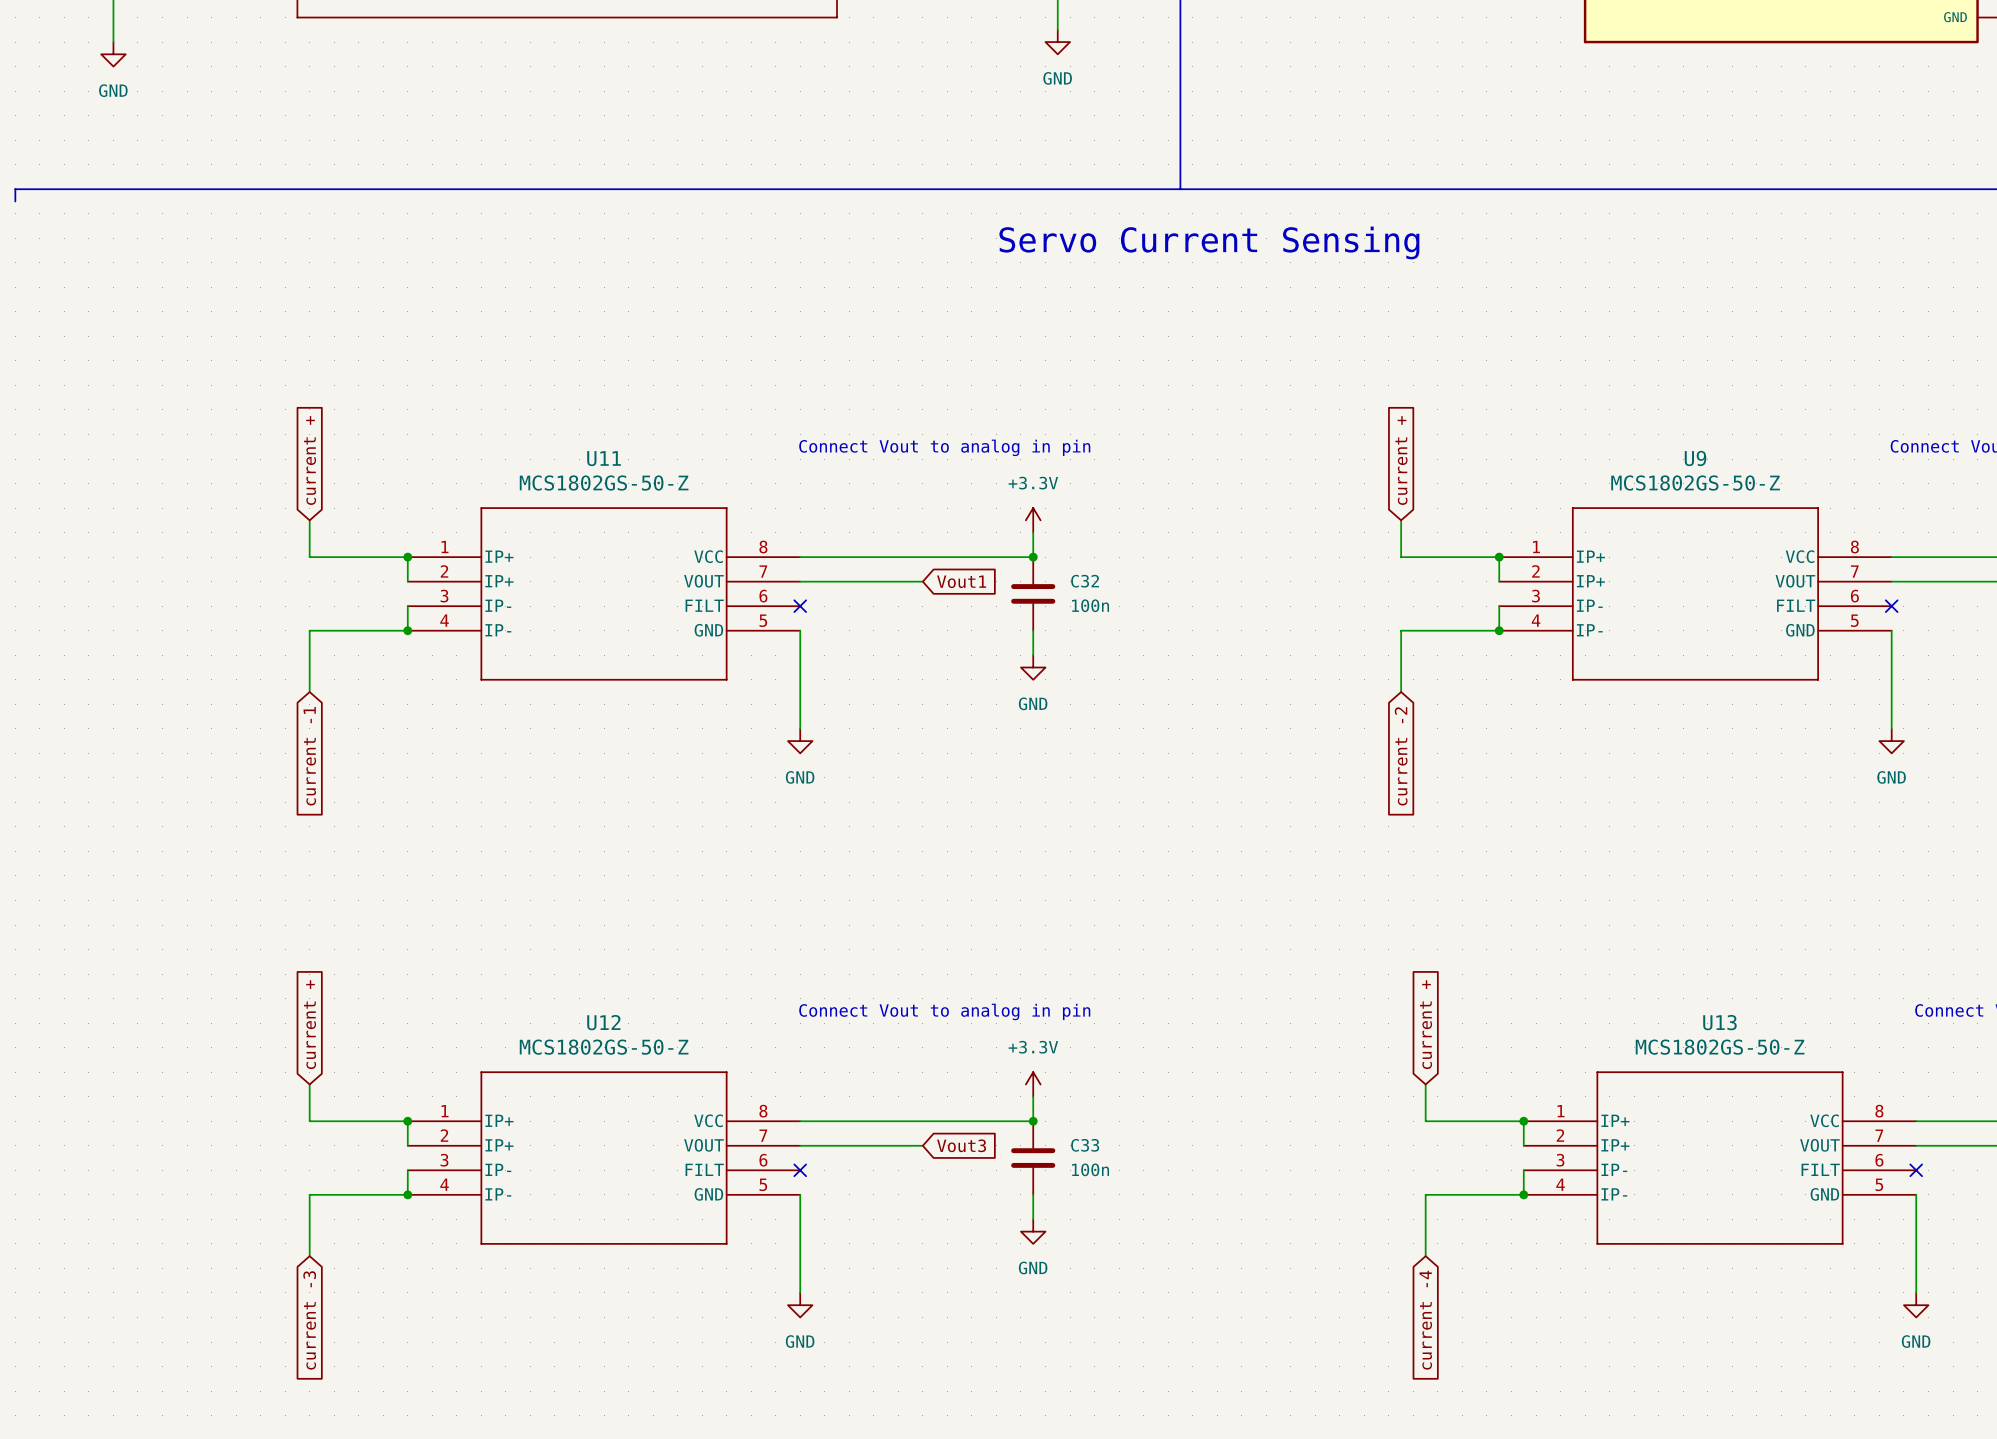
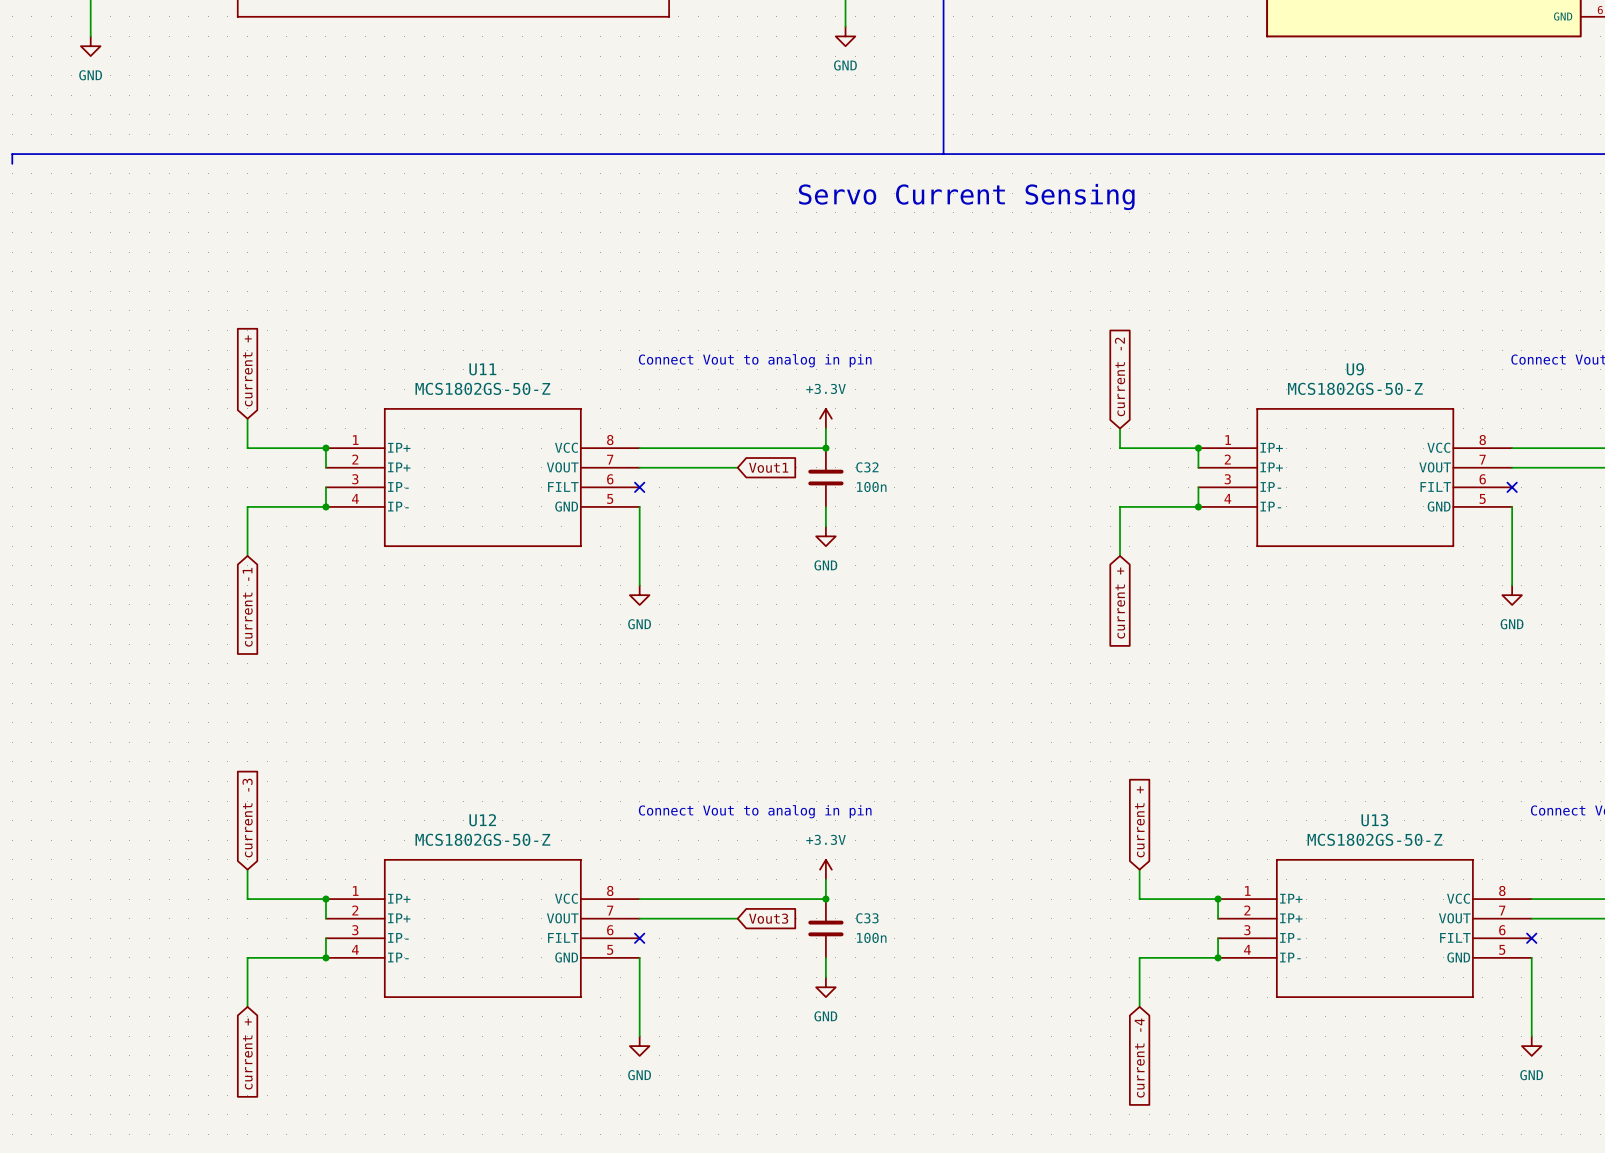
global label: current + (1401, 460) -> current -2 (1120, 376)
wire: (1401, 520) (1401, 532) -> none
global label: current -2 (1401, 756) -> current + (1120, 603)
global label: current + (310, 1024) -> current -3 (247, 818)
global label: current -3 (309, 1320) -> current + (247, 1054)

